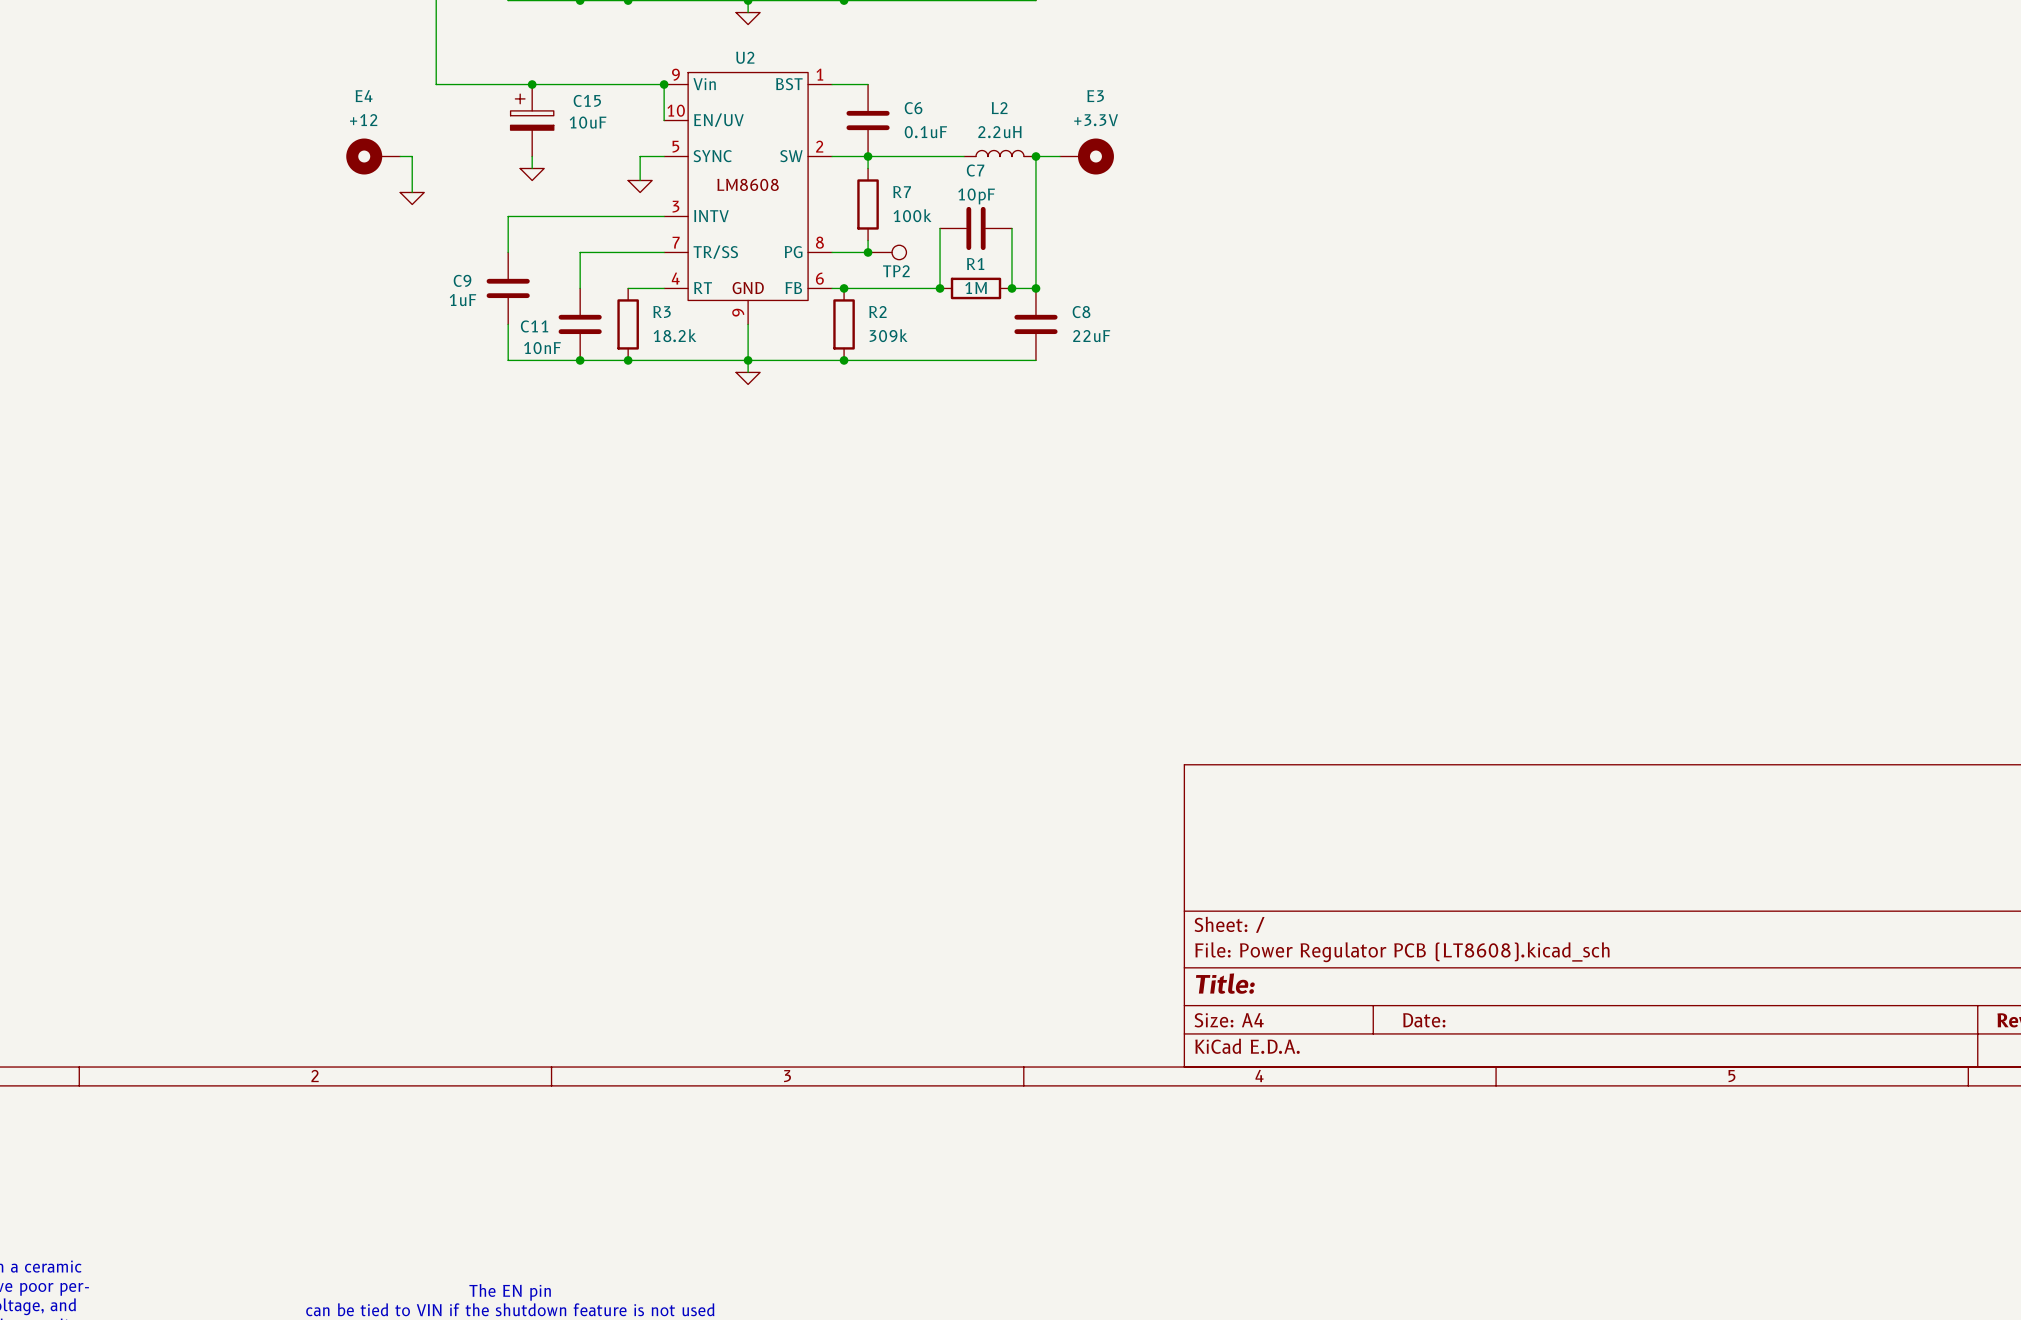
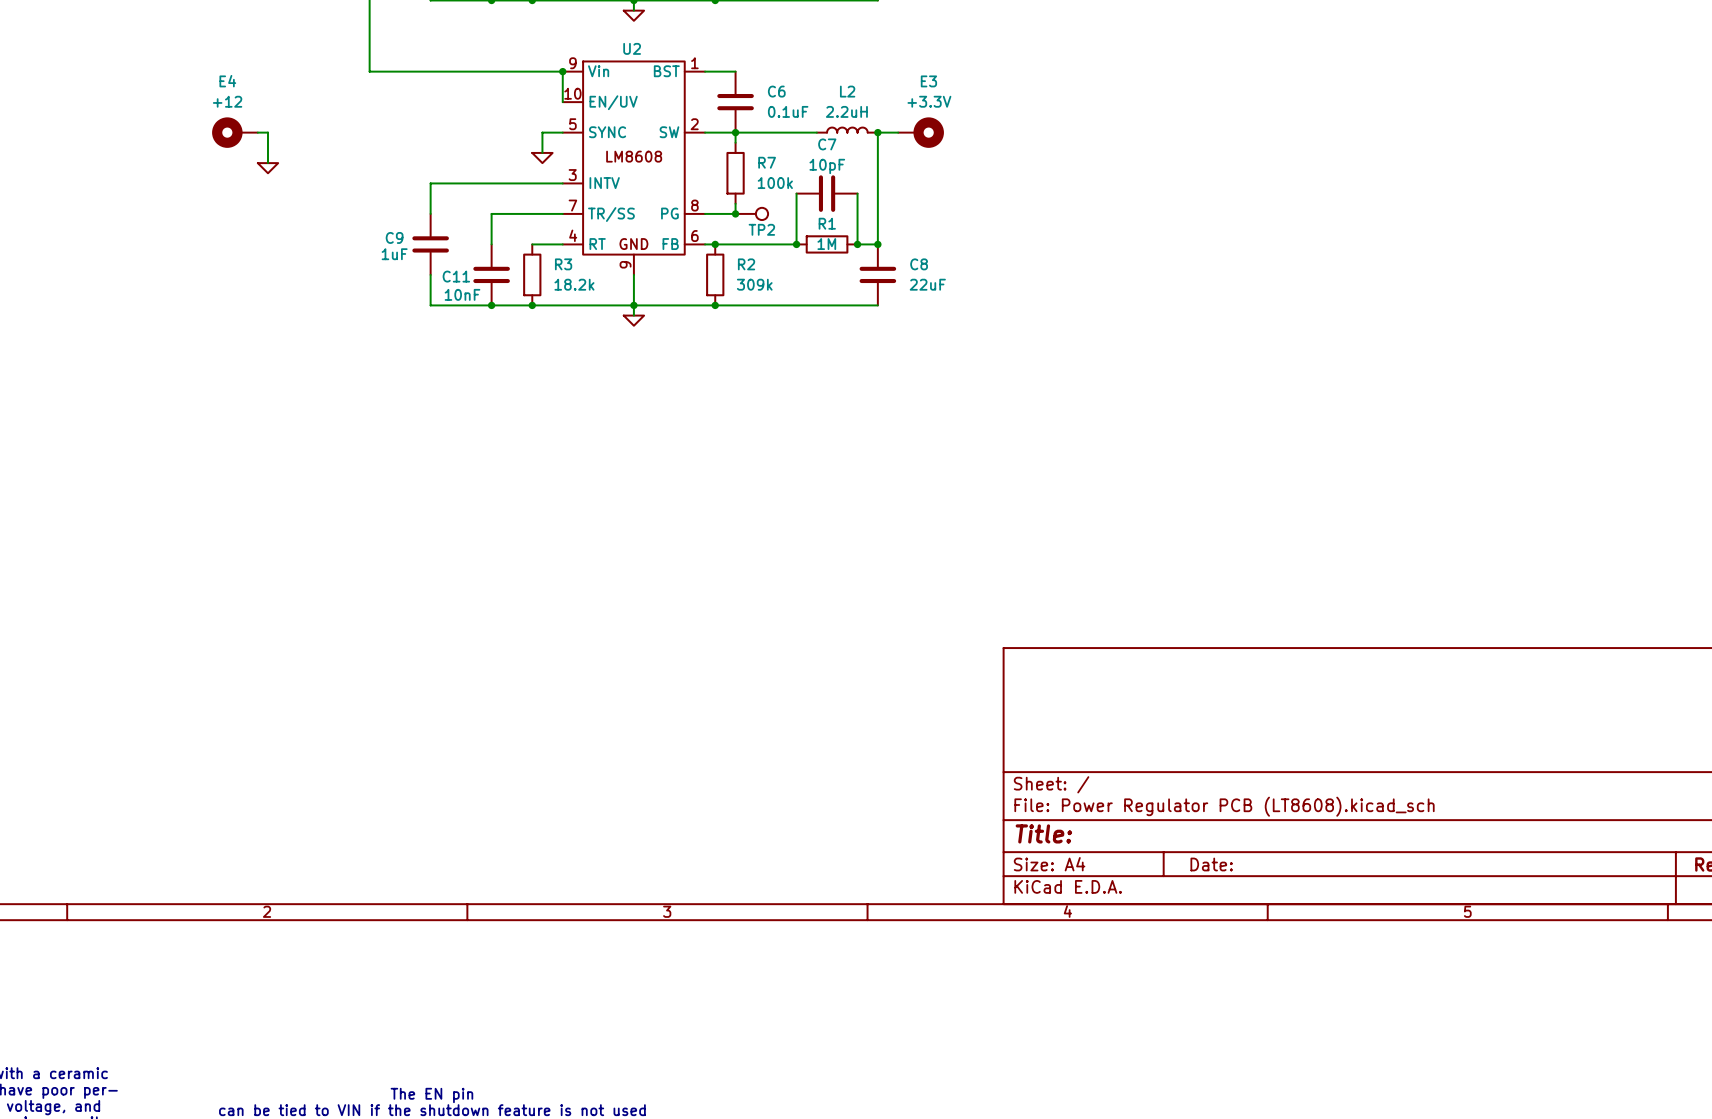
junction: (532, 84) -> none
C15: 10uF (532, 120) -> none
E4 position: (373, 156) -> (234, 132)
wire: (400, 156) (412, 156) (412, 192) -> (257, 132) (267, 132) (267, 163)
wire: (532, 156) (532, 168) -> none
power symbol: (532, 174) -> none
power symbol position: (412, 198) -> (267, 168)

